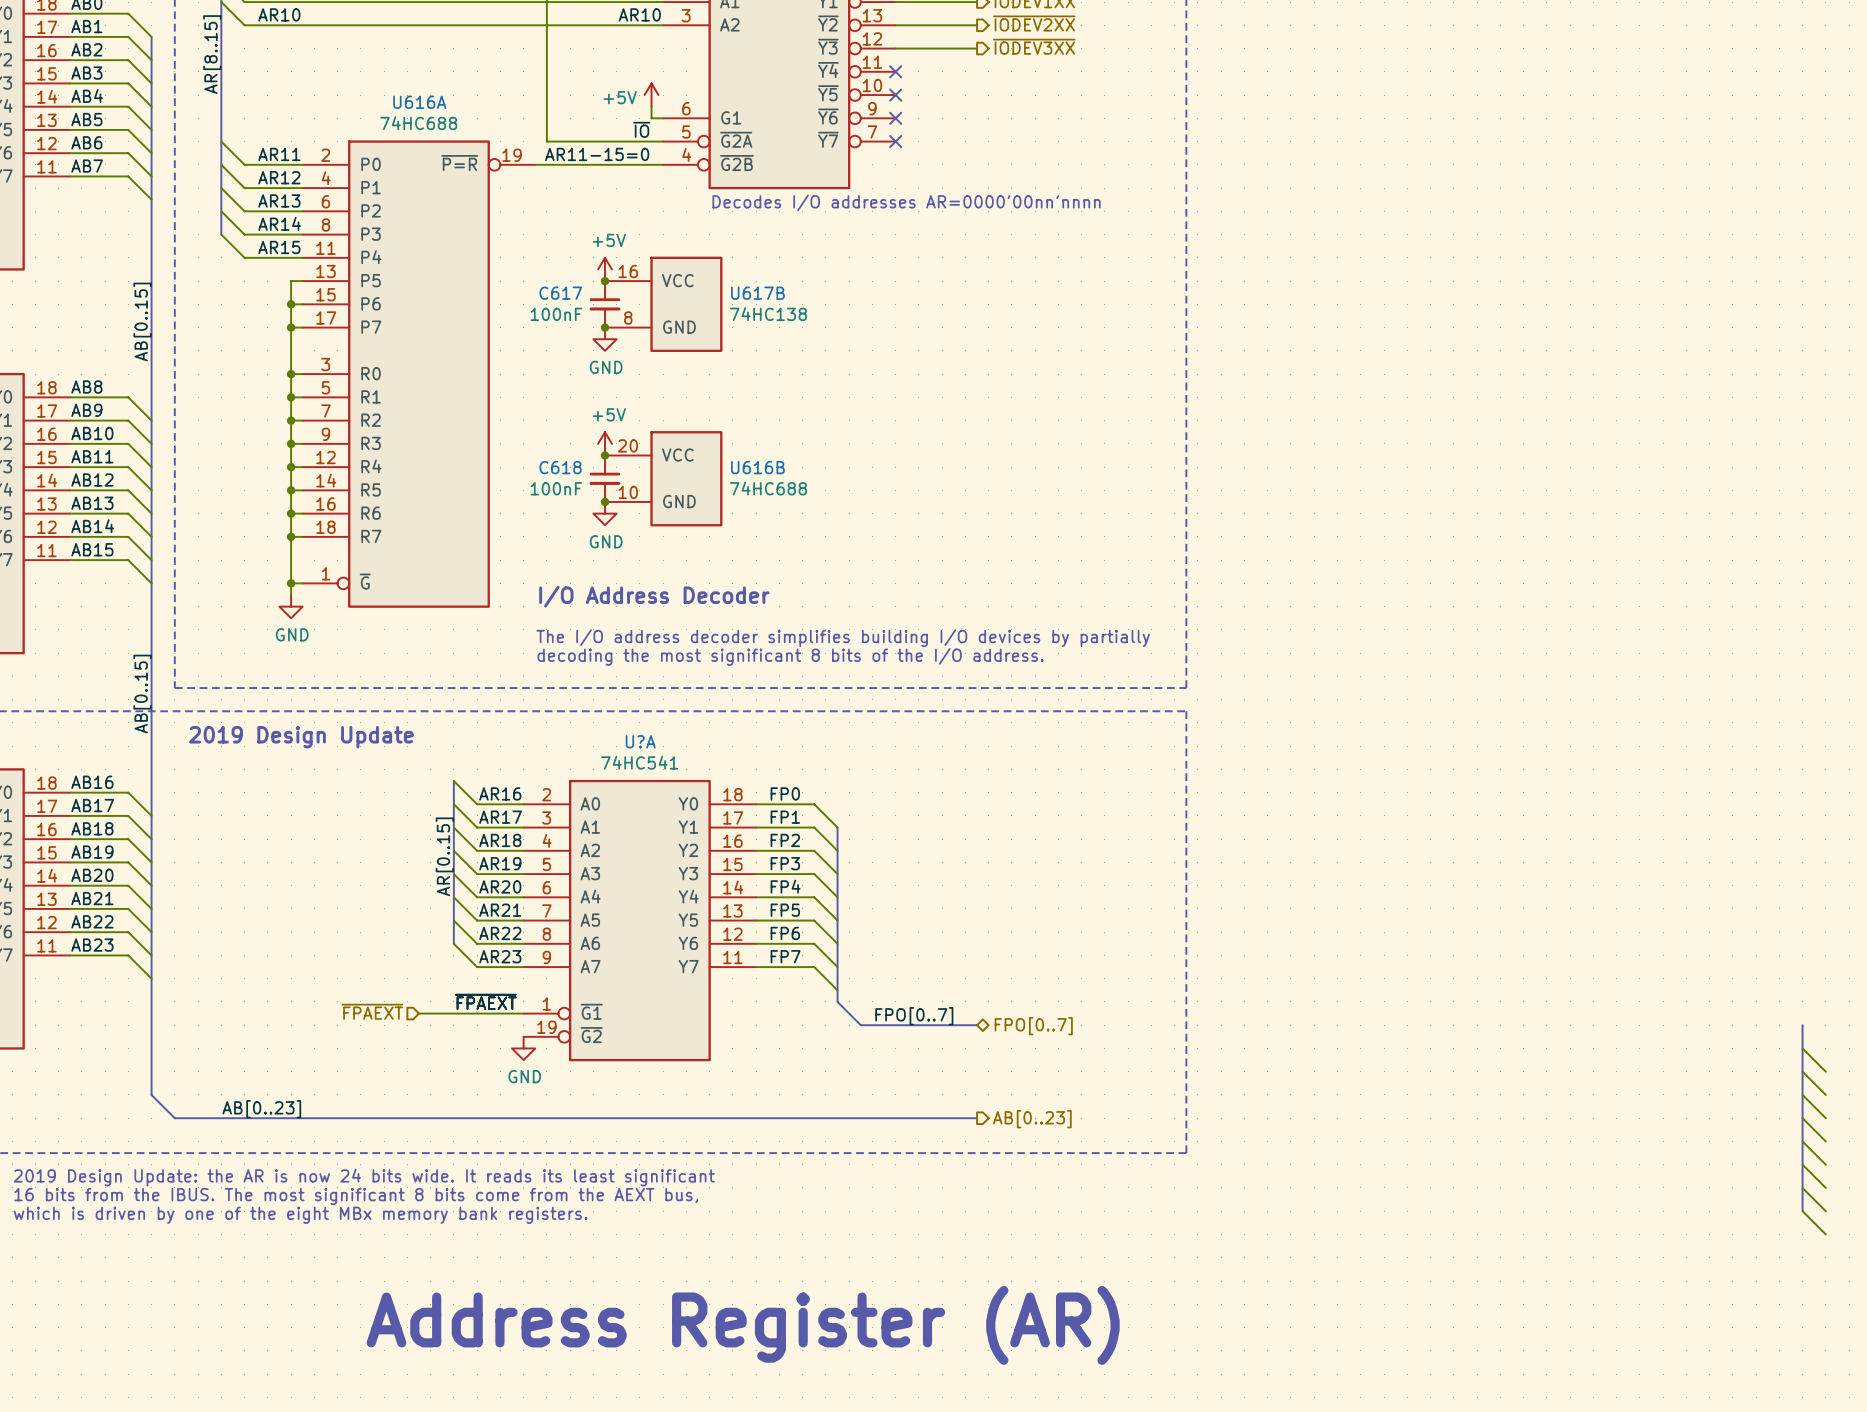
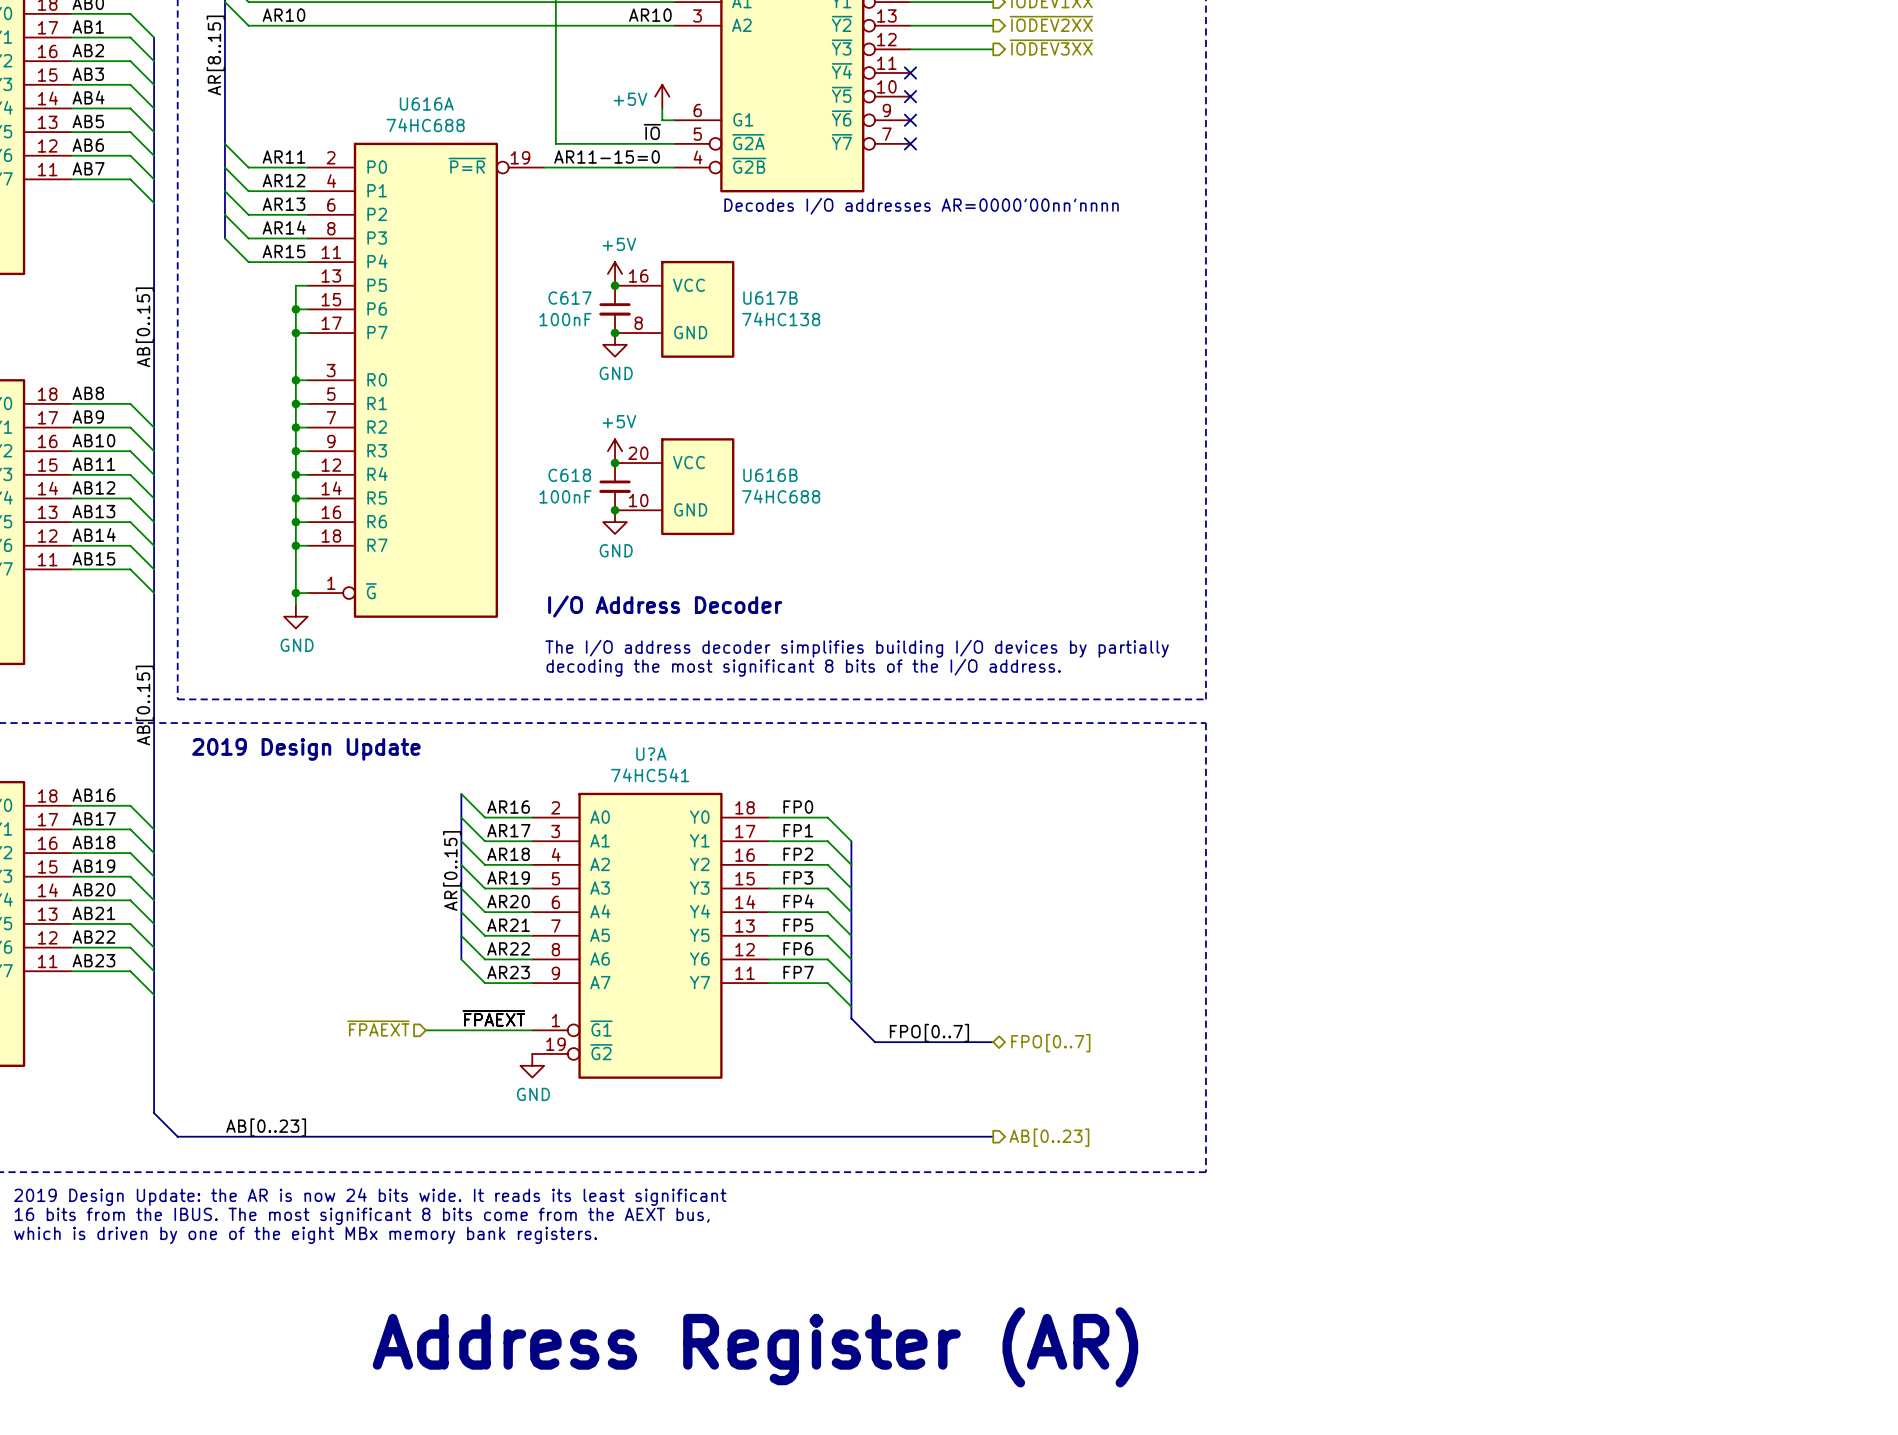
bus: (1802, 1025) (1802, 1211) -> none
wire: (1802, 1048) (1825, 1071) -> none
wire: (1802, 1071) (1825, 1094) -> none
wire: (1802, 1094) (1825, 1118) -> none
wire: (1802, 1118) (1825, 1141) -> none
wire: (1802, 1141) (1825, 1164) -> none
wire: (1802, 1164) (1825, 1187) -> none
wire: (1802, 1187) (1825, 1211) -> none
wire: (1802, 1211) (1825, 1234) -> none

